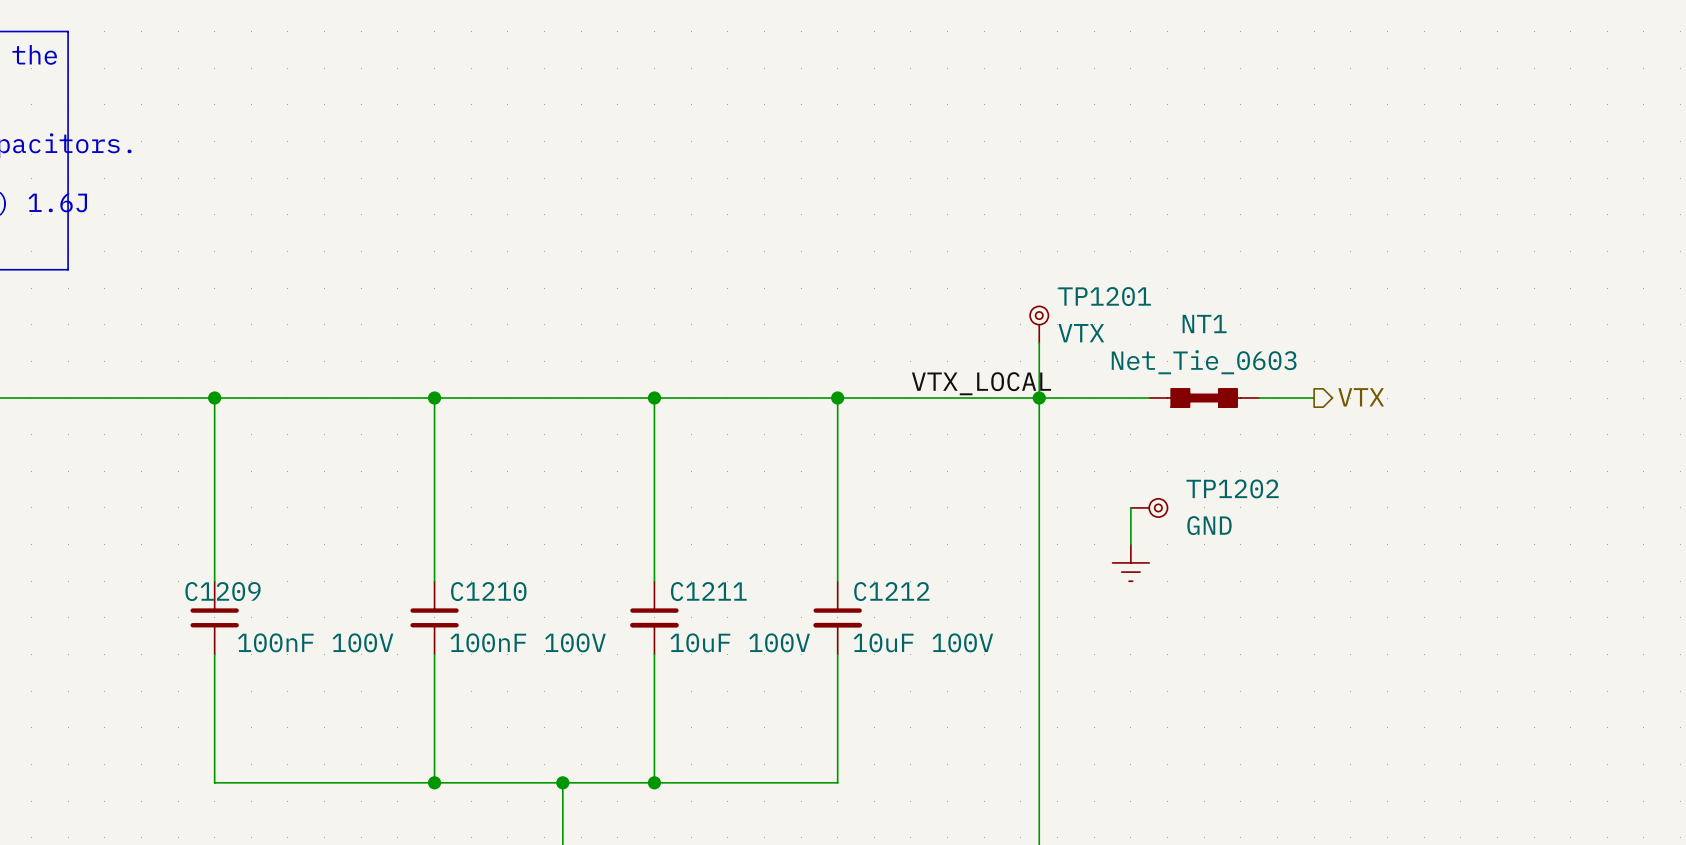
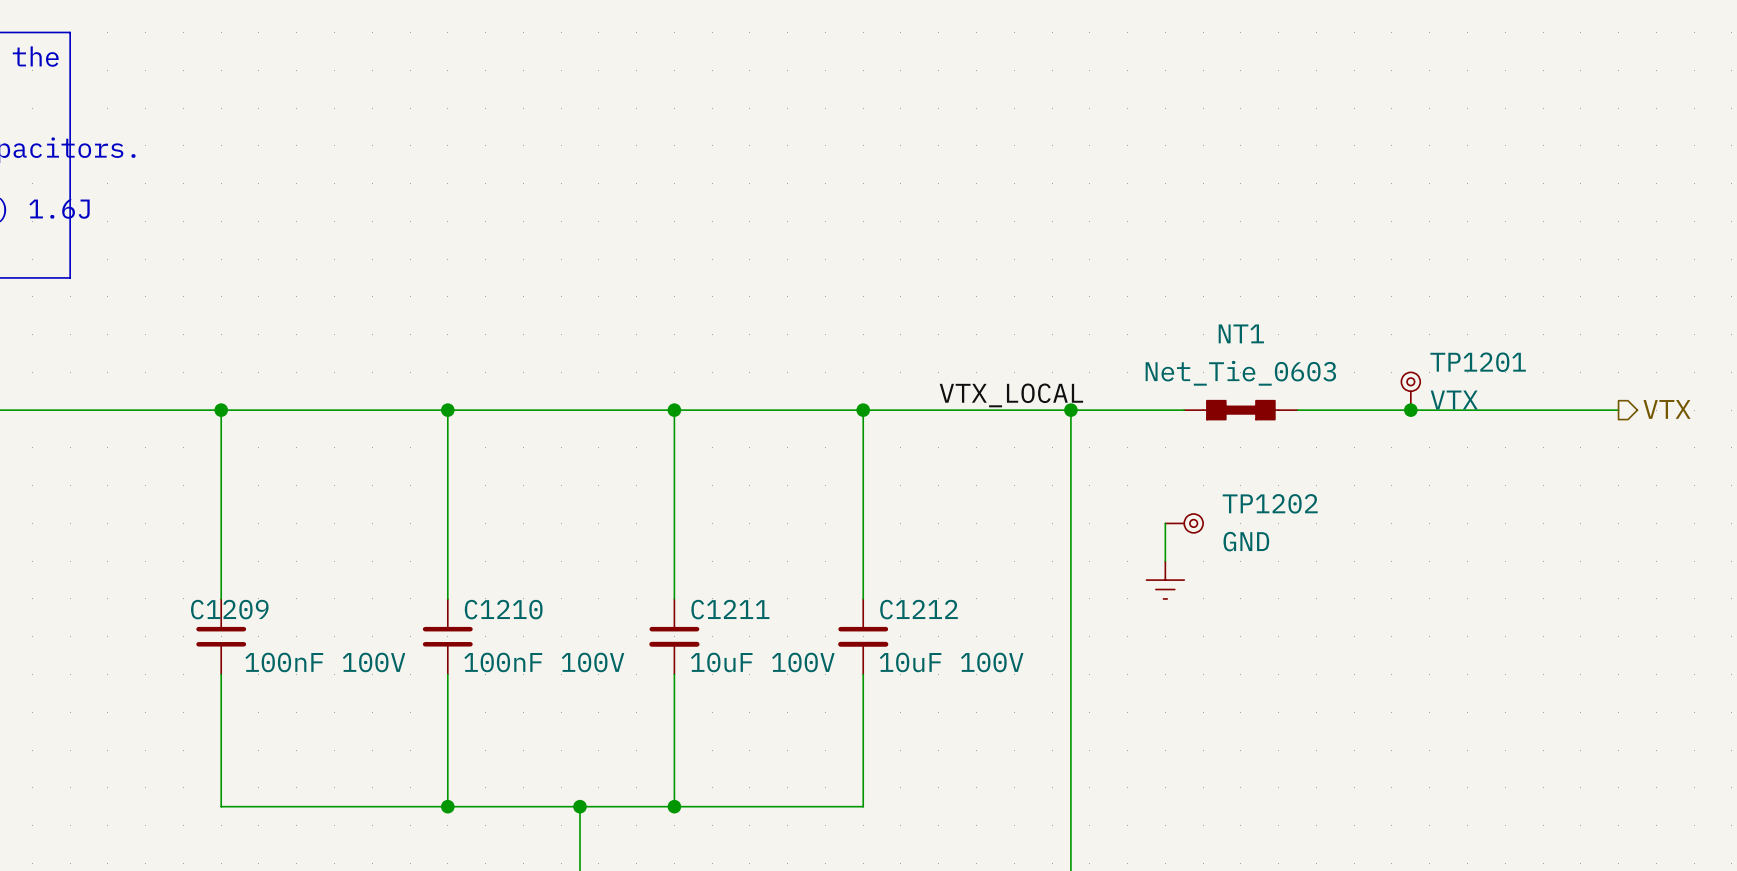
TP1201 position: (1039, 324) -> (1410, 391)
wire: (1039, 343) (1039, 398) -> none
hierarchical label position: VTX (1361, 397) -> VTX (1667, 409)
wire: none -> (1354, 410) (1618, 410)
junction: none -> (1410, 410)

